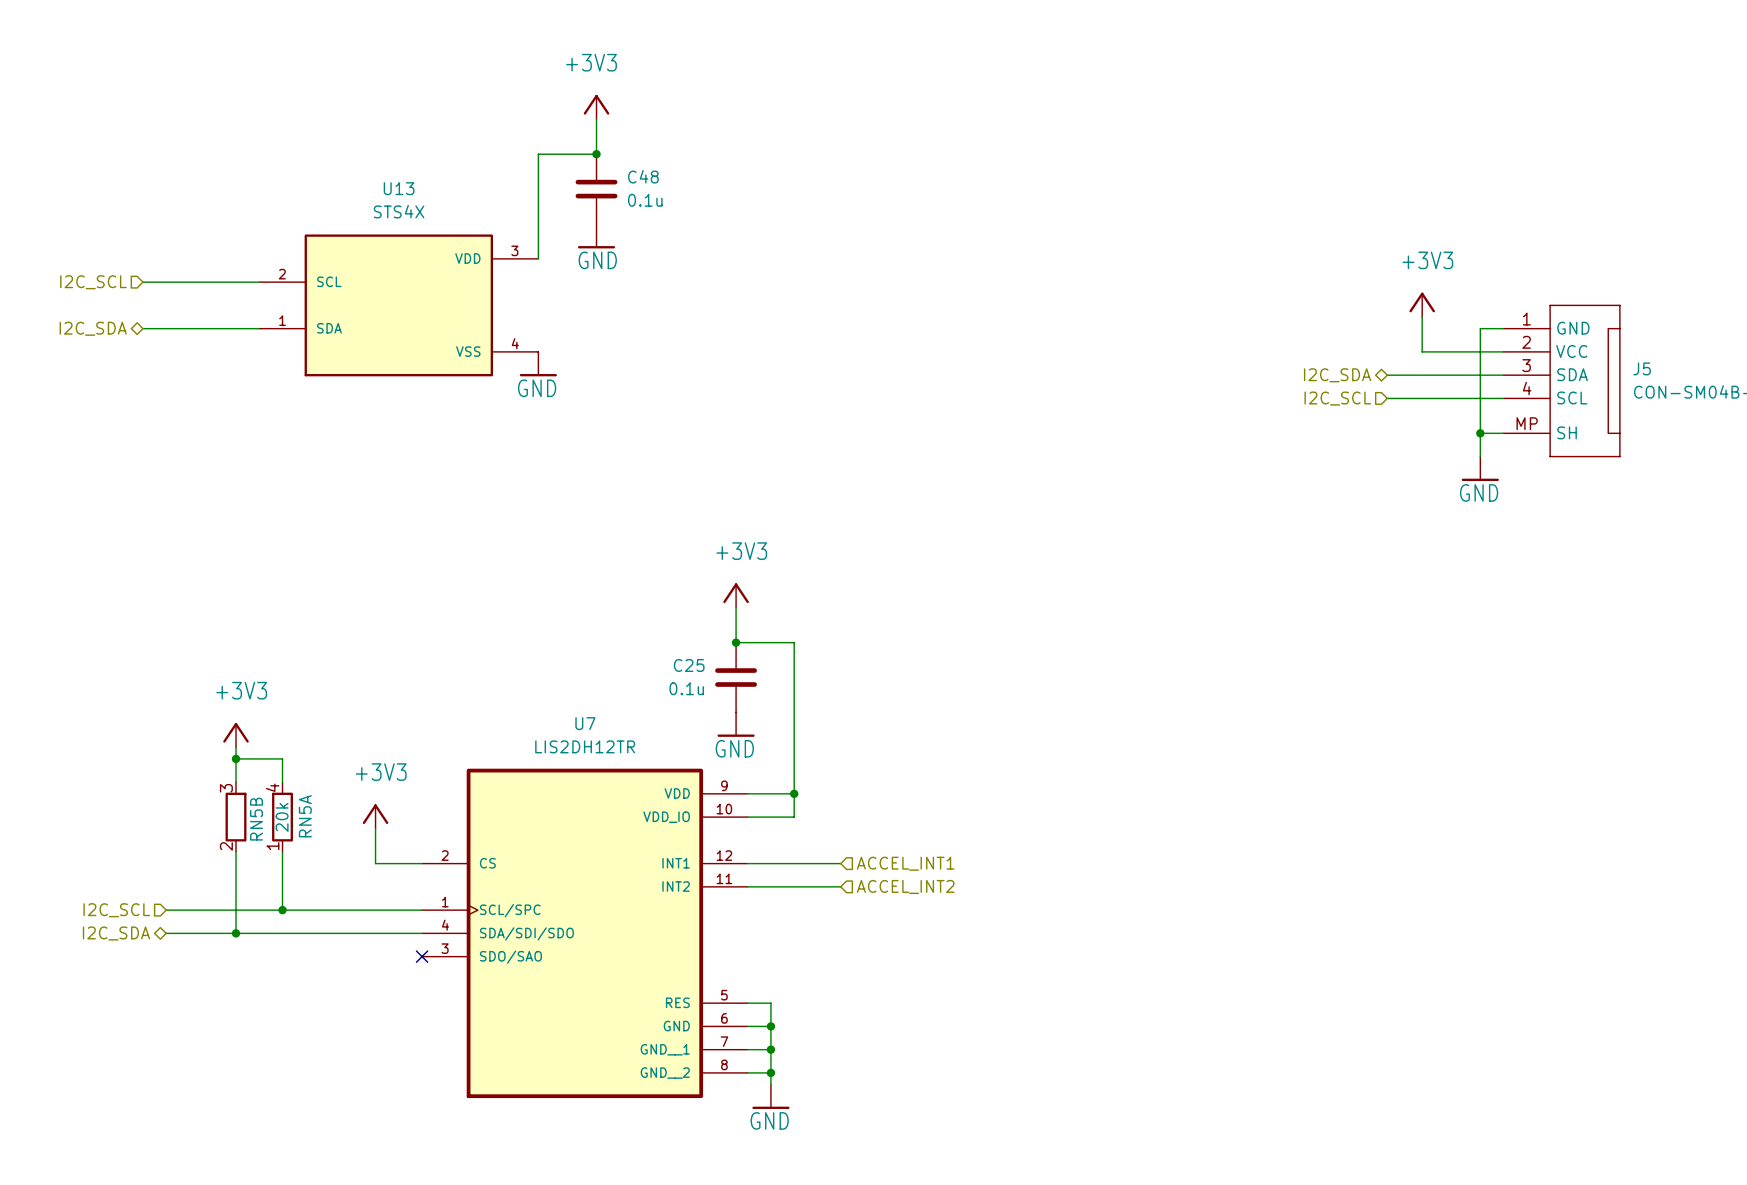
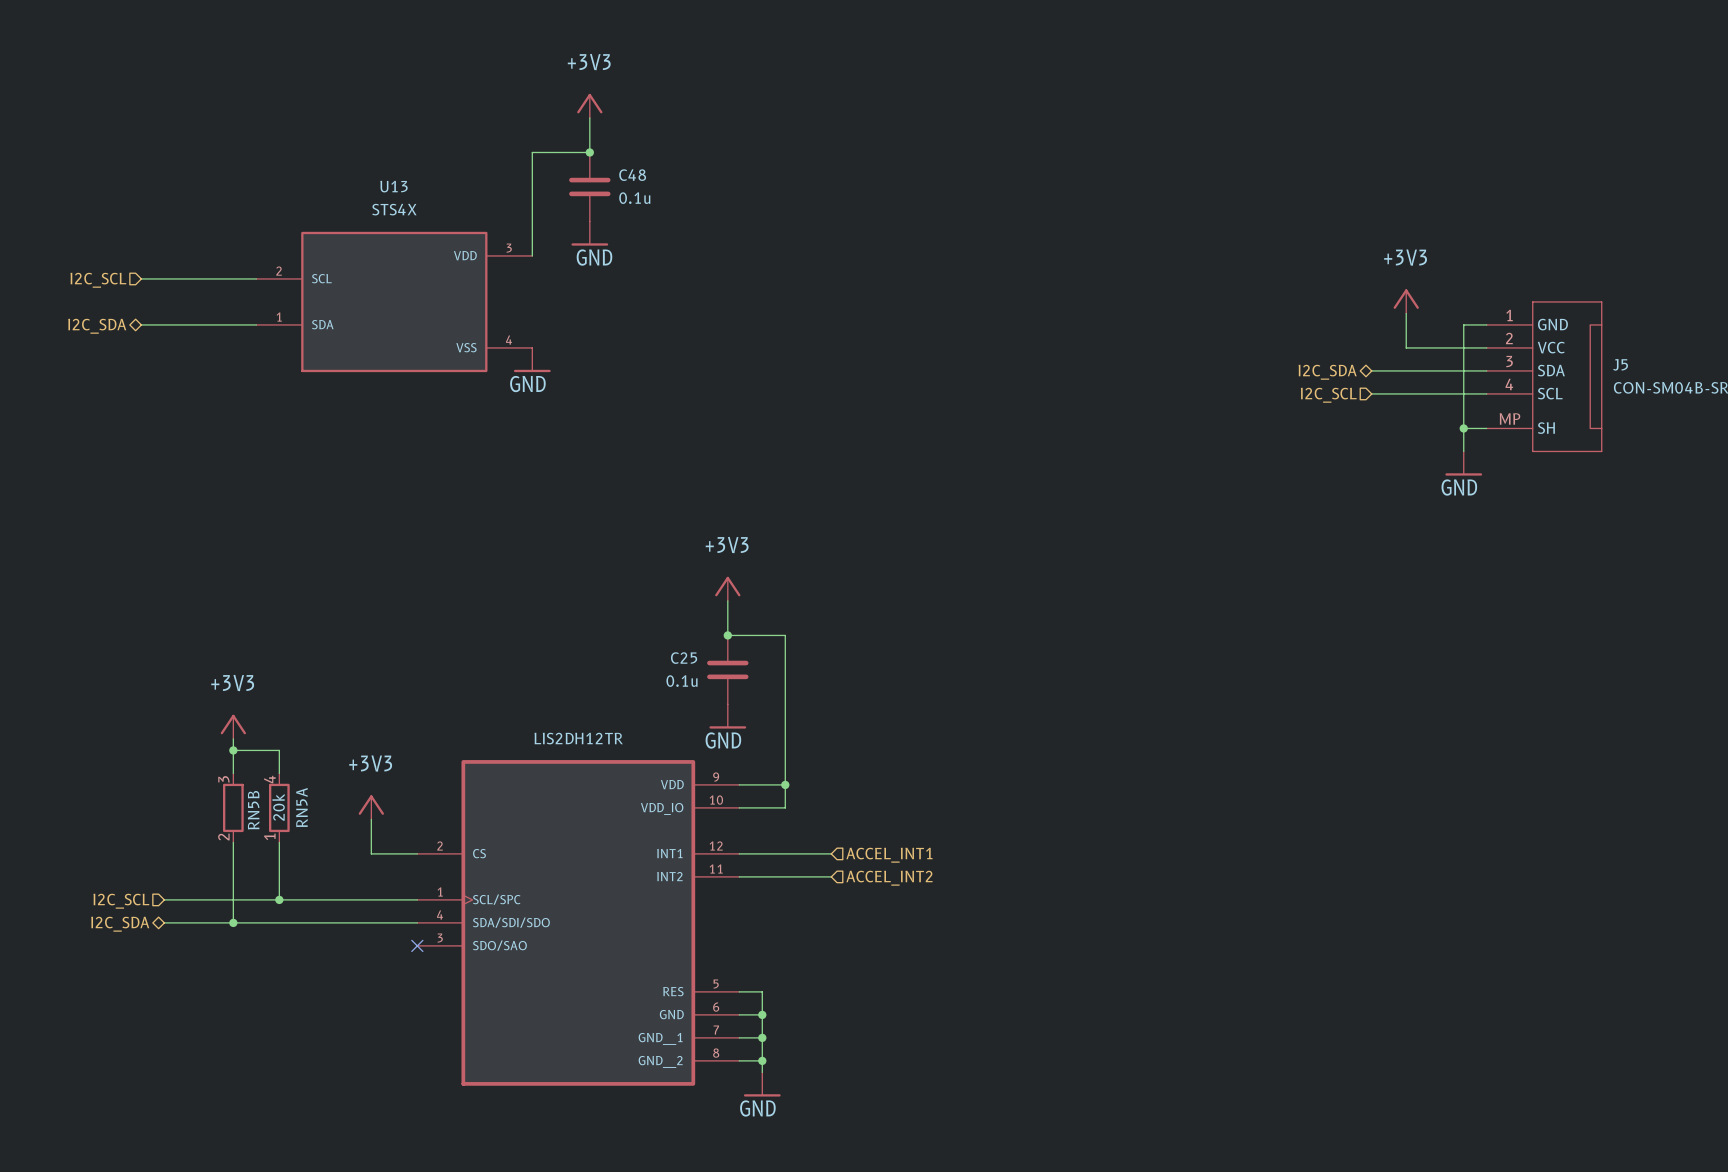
U7 name: U7 (585, 723) -> none

